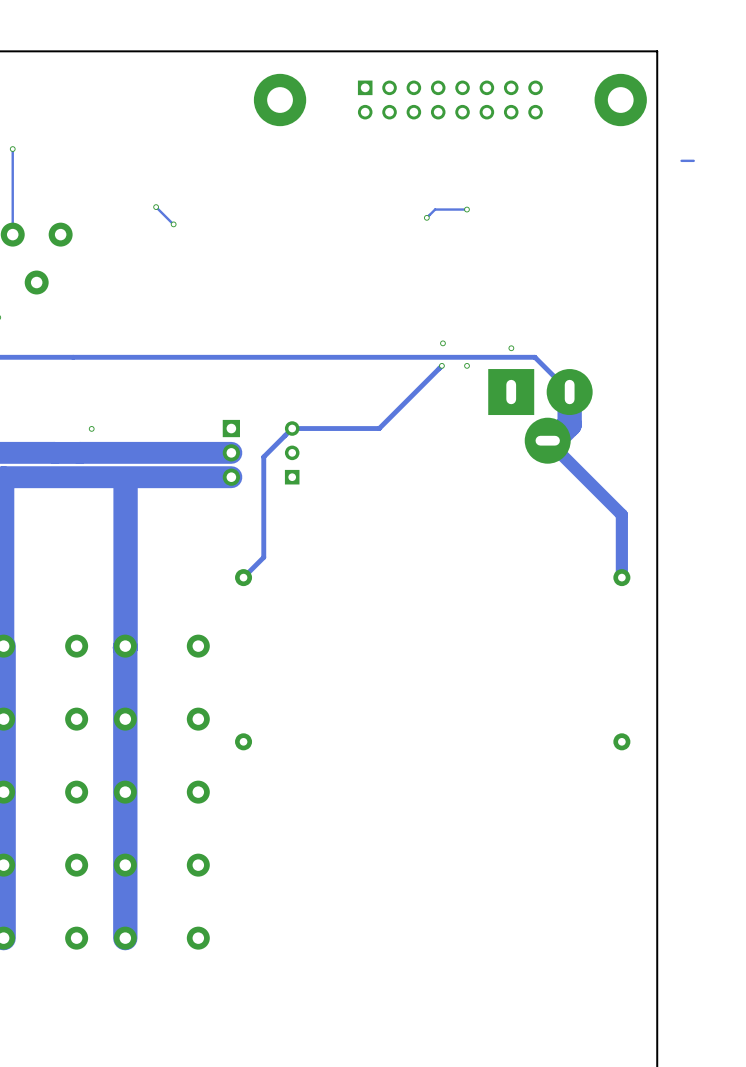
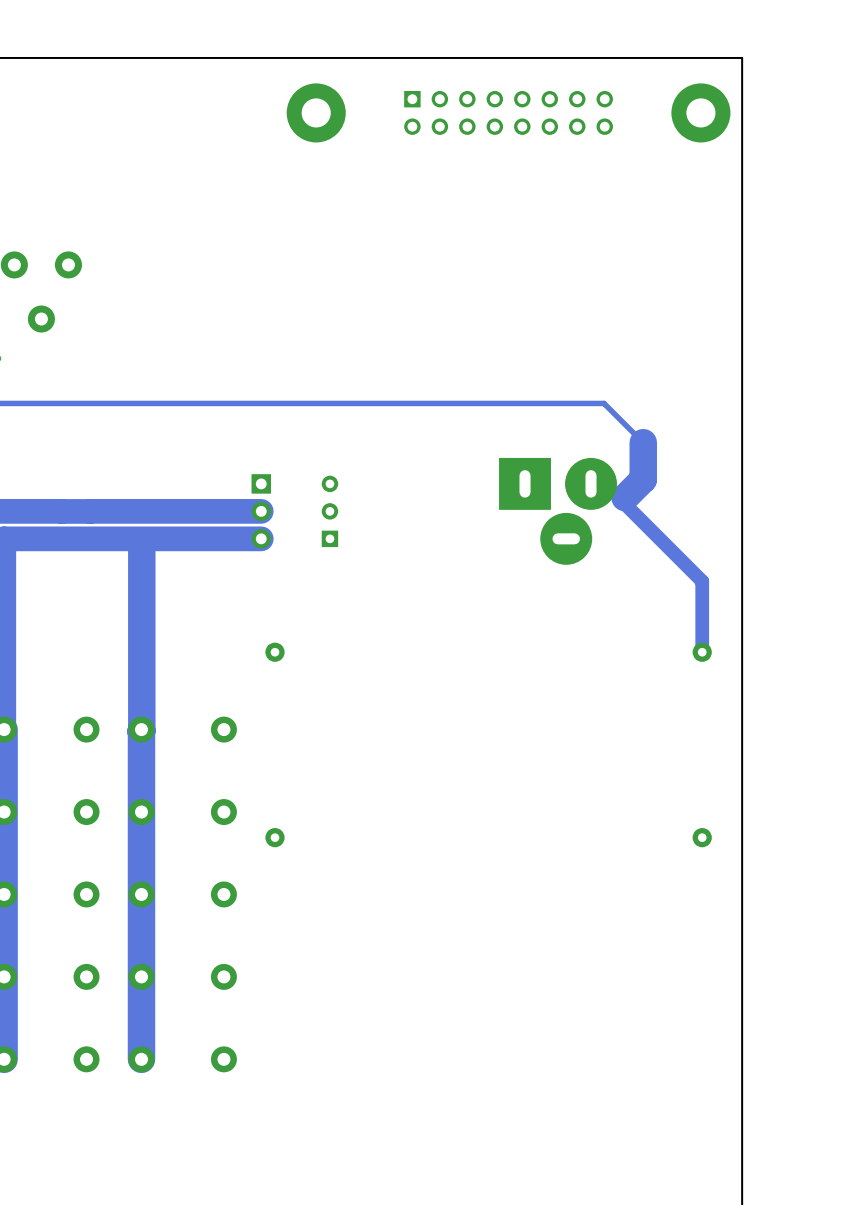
track: (12, 149) (12, 234) -> none
via: (12, 149) -> none
track: (693, 160) (681, 160) -> none
track: (156, 207) (173, 224) -> none
via: (156, 207) -> none
track: (466, 209) (435, 209) (426, 217) -> none
via: (466, 209) -> none
via: (426, 217) -> none
via: (173, 224) -> none
via: (442, 343) -> none
via: (511, 348) -> none
track: (441, 365) (379, 428) (292, 428) (263, 456) (263, 557) (243, 577) -> none
via: (441, 365) -> none
via: (467, 365) -> none
part position: (540, 416) -> (558, 511)
via: (91, 428) -> none

